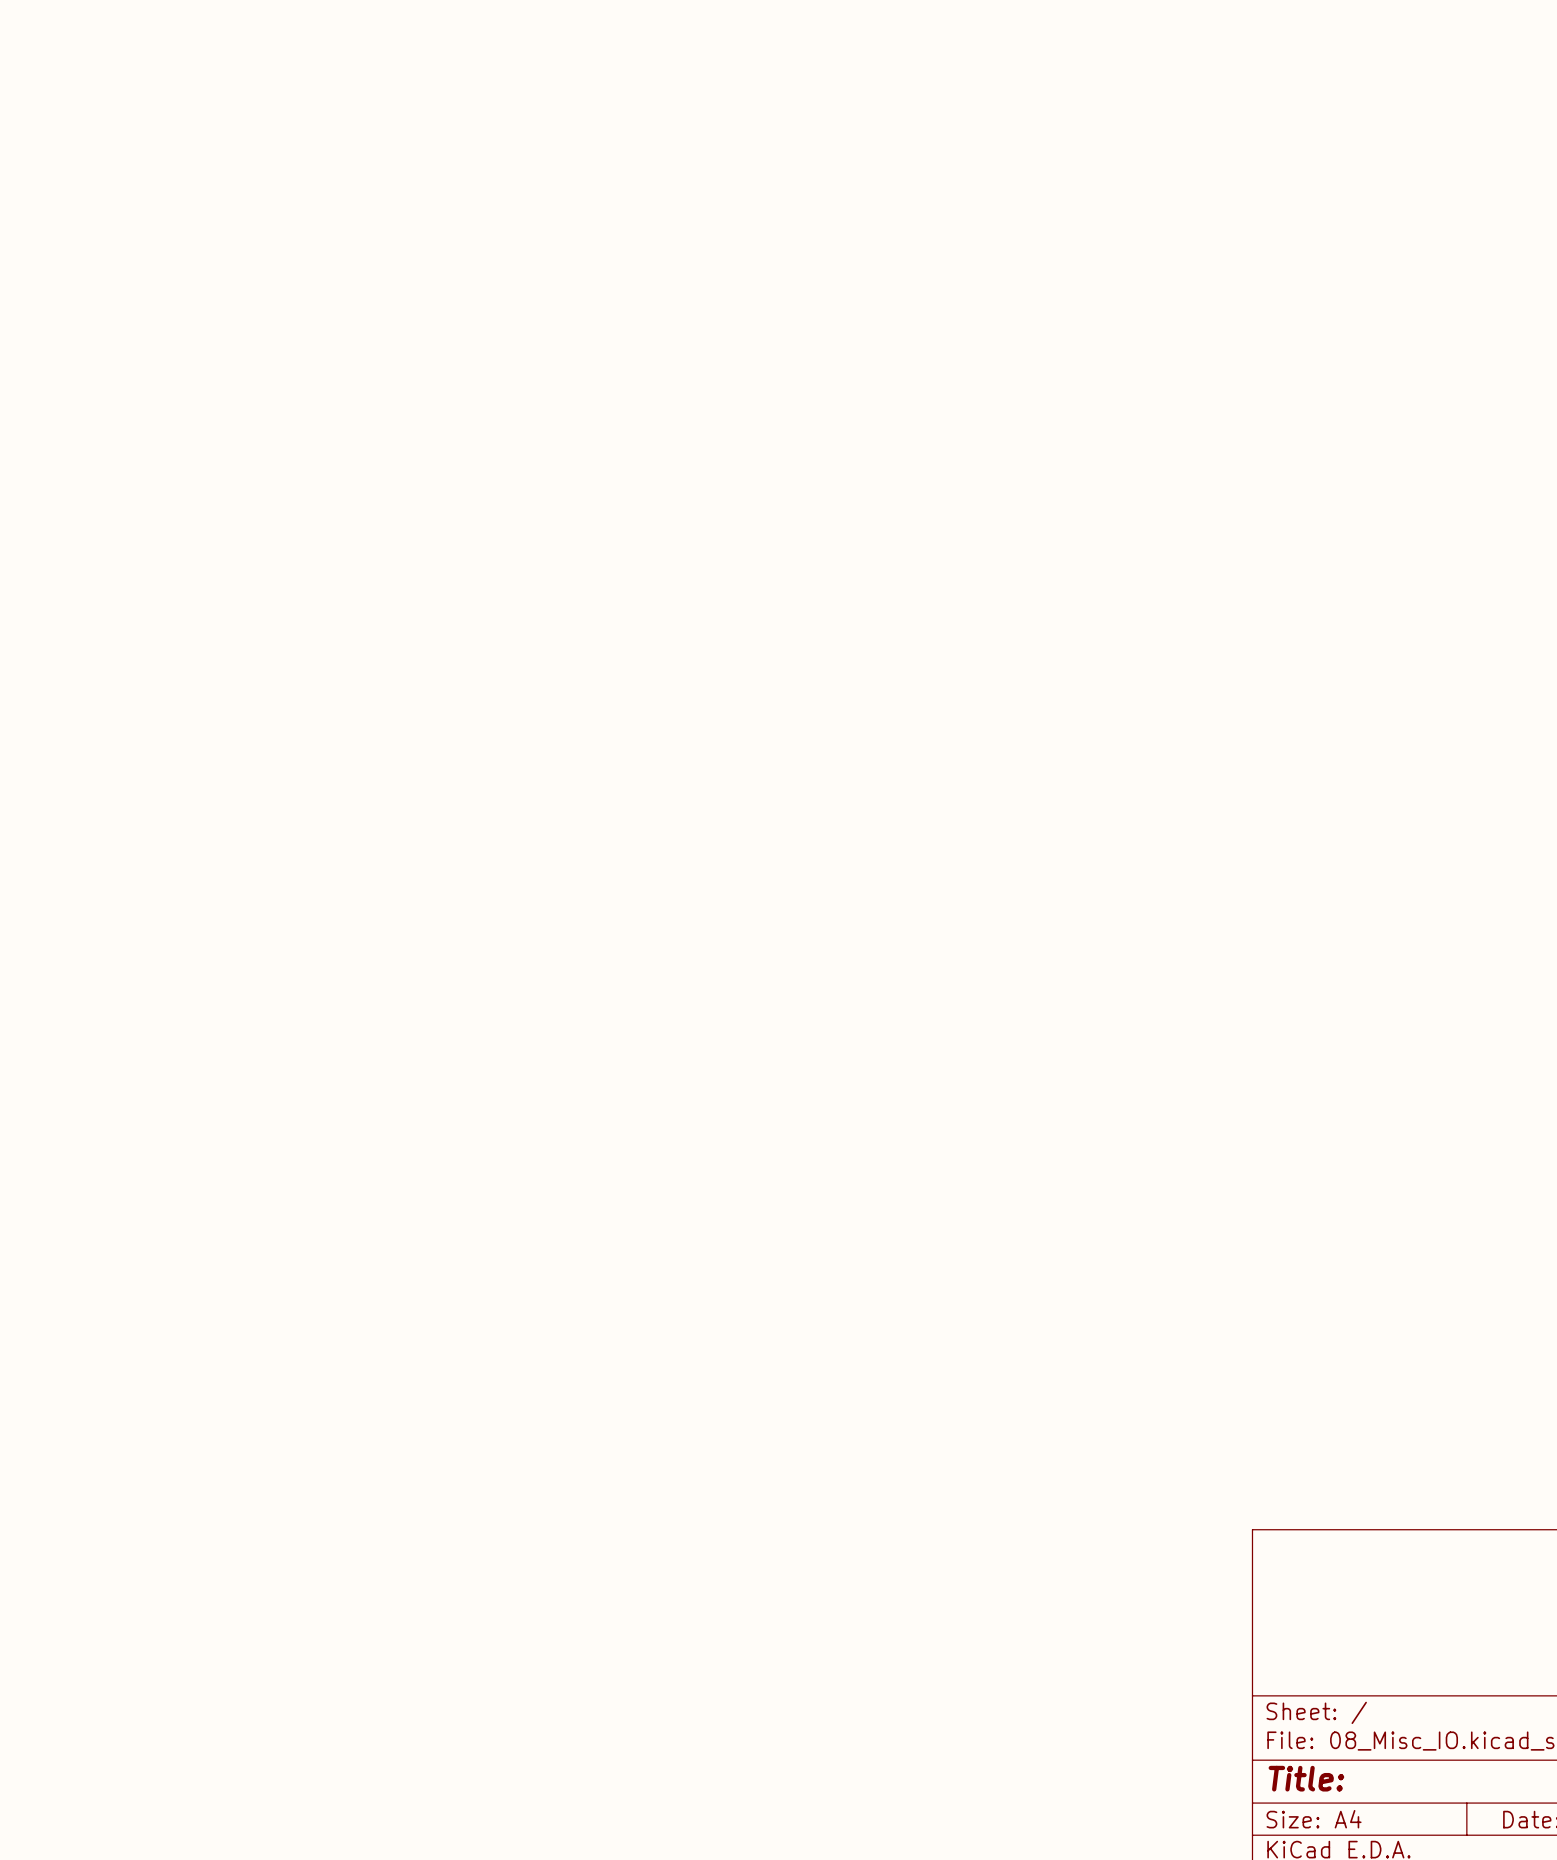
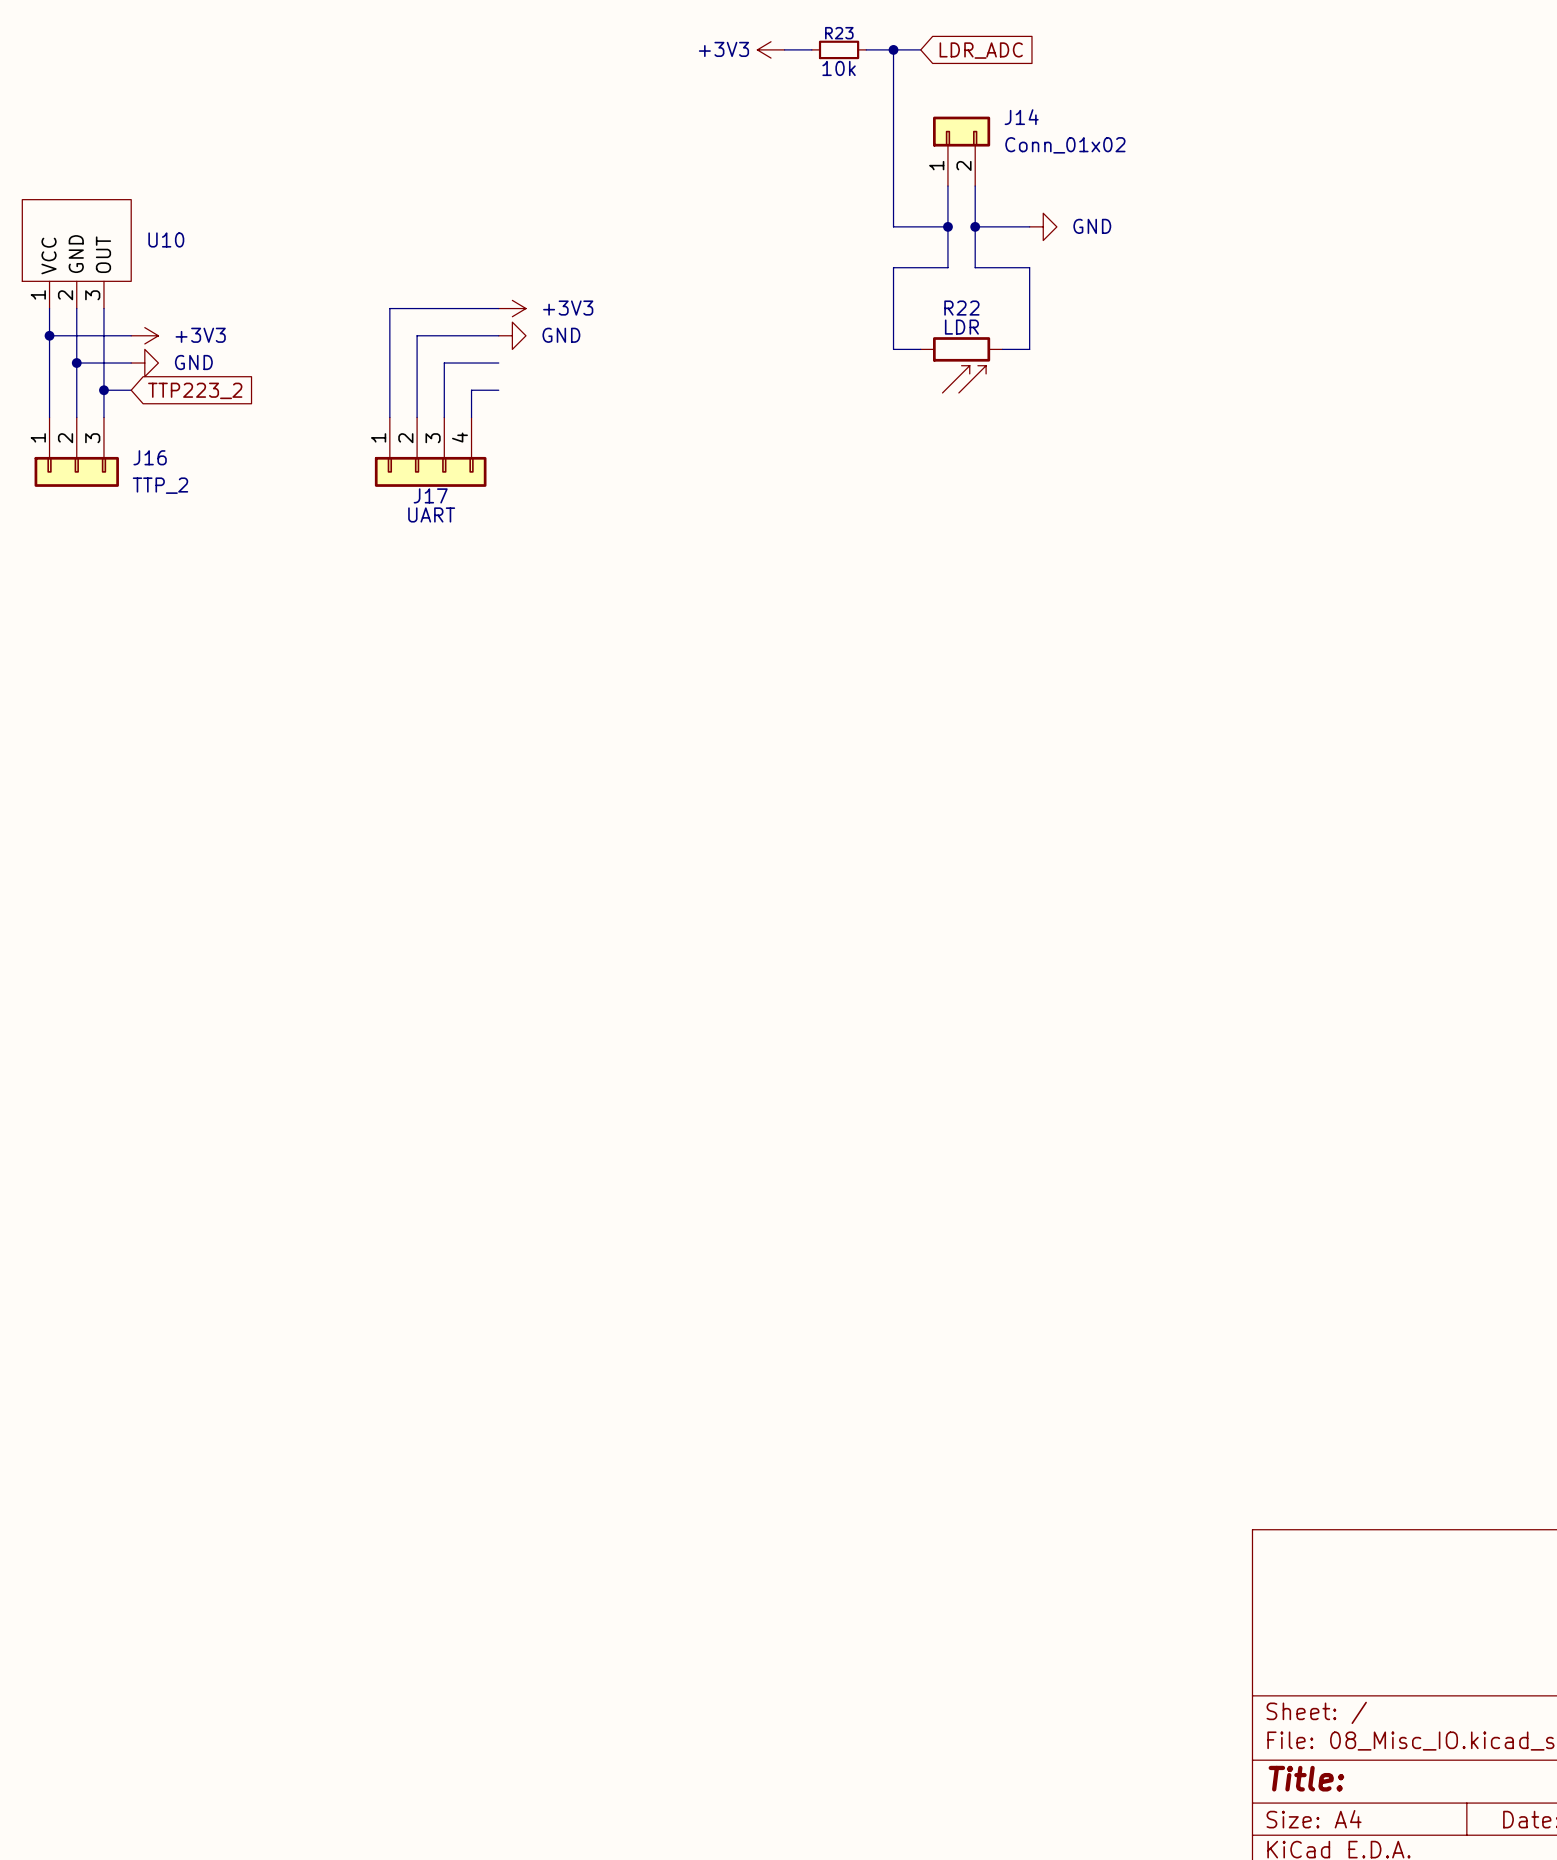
power symbol: none -> +3V3 (771, 49)
wire: none -> (784, 49) (811, 49)
R23: none -> 10k (839, 49)
wire: none -> (866, 49) (920, 49)
wire: none -> (893, 49) (893, 226) (947, 226)
junction: none -> (893, 49)
global label: none -> LDR_ADC (981, 50)
J14: none -> Conn_01x02 (961, 151)
wire: none -> (947, 186) (947, 267) (893, 267) (893, 349) (920, 349)
wire: none -> (975, 186) (975, 267) (1029, 267) (1029, 349) (1002, 349)
junction: none -> (947, 226)
wire: none -> (975, 226) (1029, 226)
junction: none -> (975, 226)
power symbol: none -> GND (1043, 226)
U10: none -> (76, 254)
wire: none -> (49, 308) (49, 417)
wire: none -> (76, 308) (76, 417)
wire: none -> (103, 308) (103, 417)
wire: none -> (498, 308) (389, 308) (389, 417)
power symbol: none -> +3V3 (512, 308)
wire: none -> (49, 335) (131, 335)
junction: none -> (49, 335)
power symbol: none -> +3V3 (144, 335)
wire: none -> (498, 335) (417, 335) (417, 417)
power symbol: none -> GND (512, 335)
wire: none -> (76, 363) (131, 363)
junction: none -> (76, 363)
power symbol: none -> GND (144, 363)
wire: none -> (498, 363) (444, 363) (444, 417)
R22: none -> LDR (961, 365)
wire: none -> (103, 390) (131, 390)
junction: none -> (103, 390)
global label: none -> TTP223_2 (195, 390)
wire: none -> (498, 390) (471, 390) (471, 417)
J16: none -> TTP_2 (76, 452)
J17: none -> UART (430, 452)

